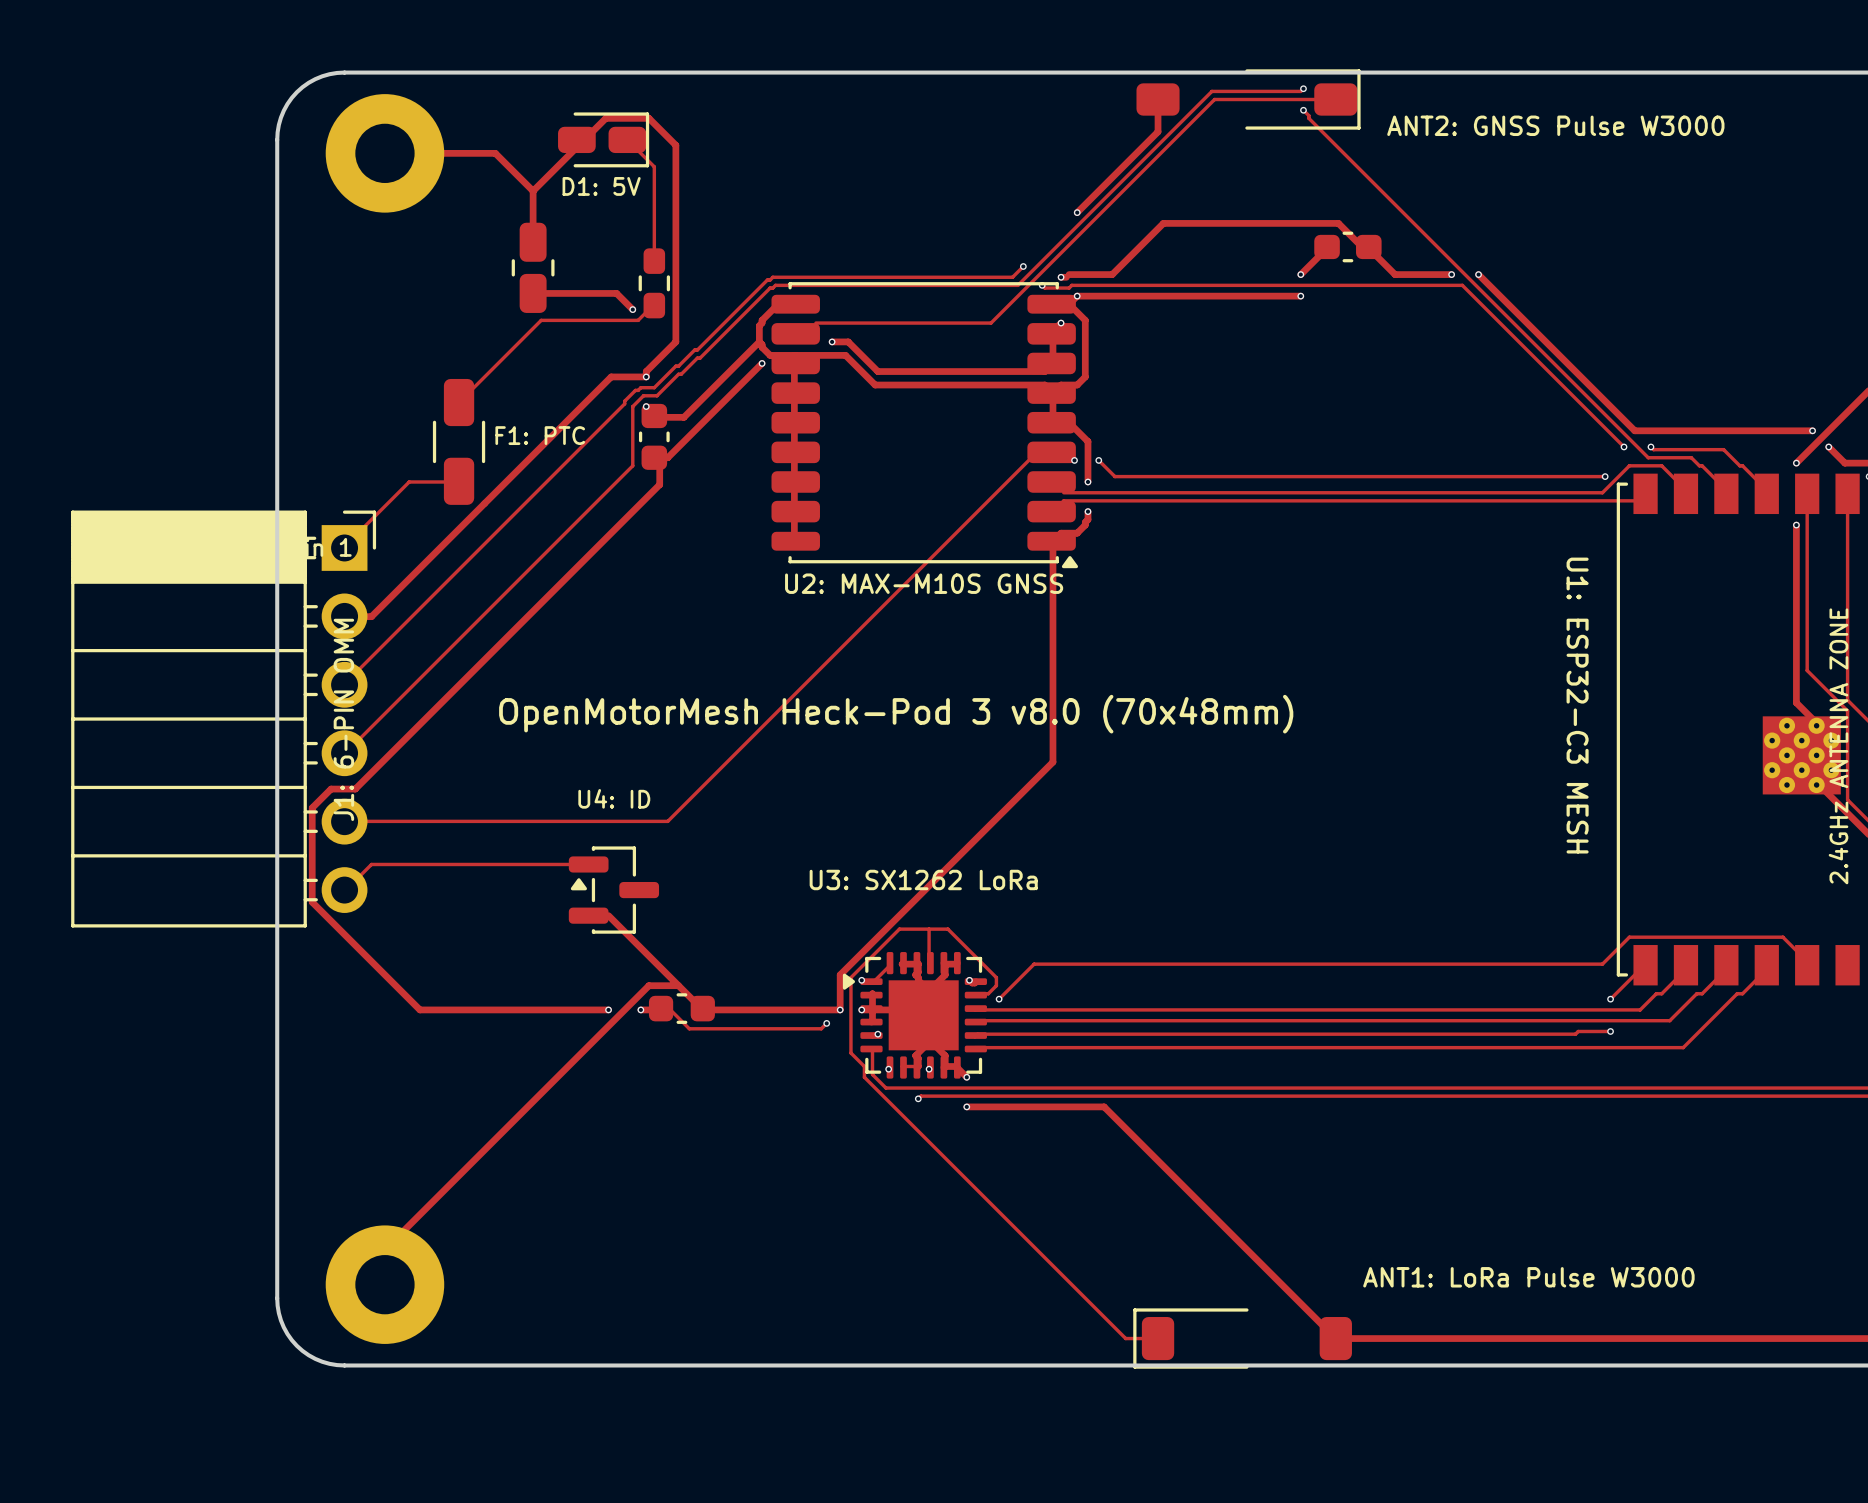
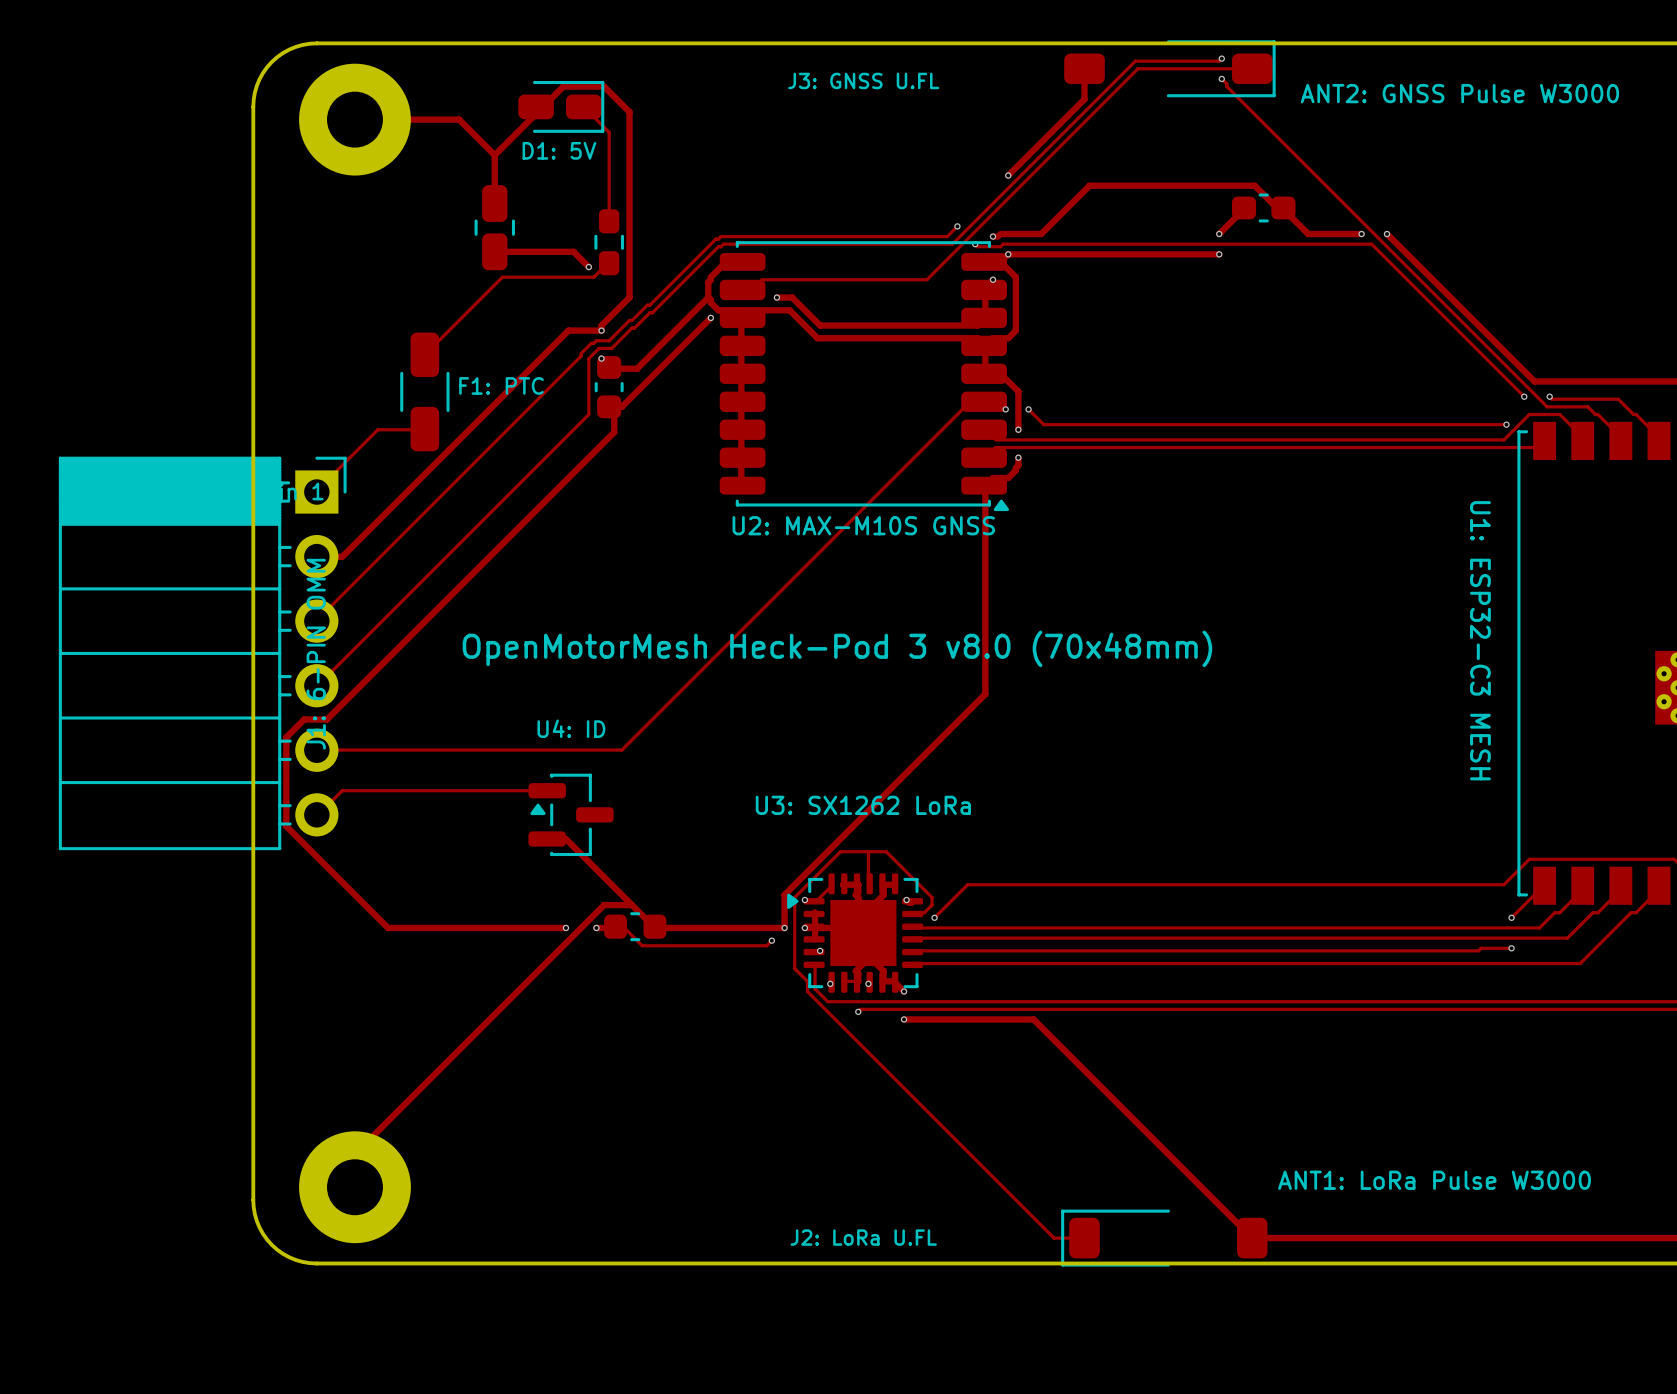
text: none -> J3: GNSS U.FL (863, 80)
text: none -> J2: LoRa U.FL (863, 1237)

